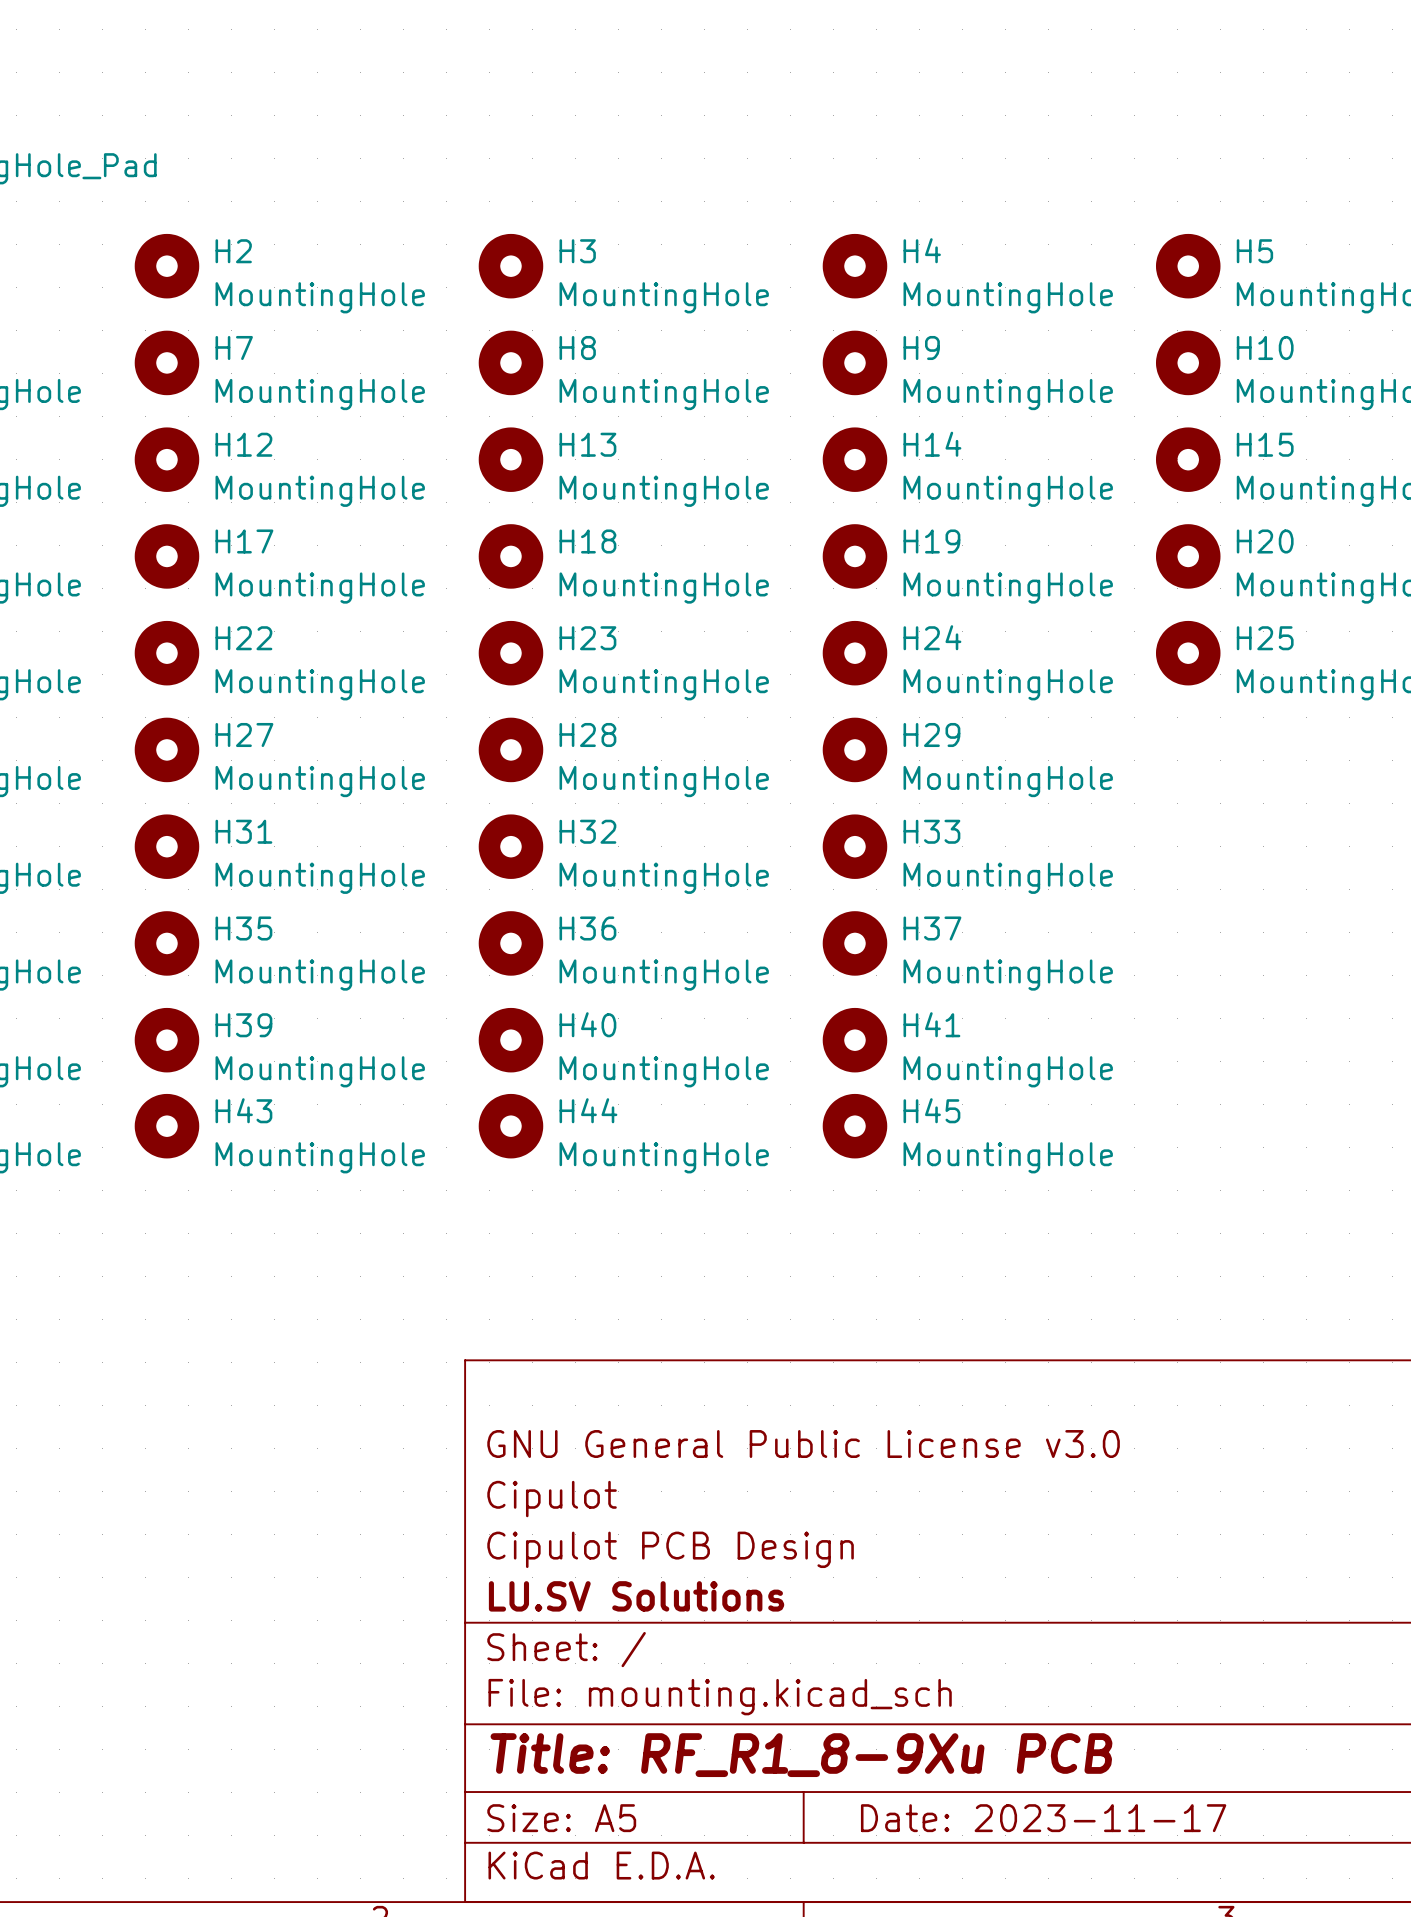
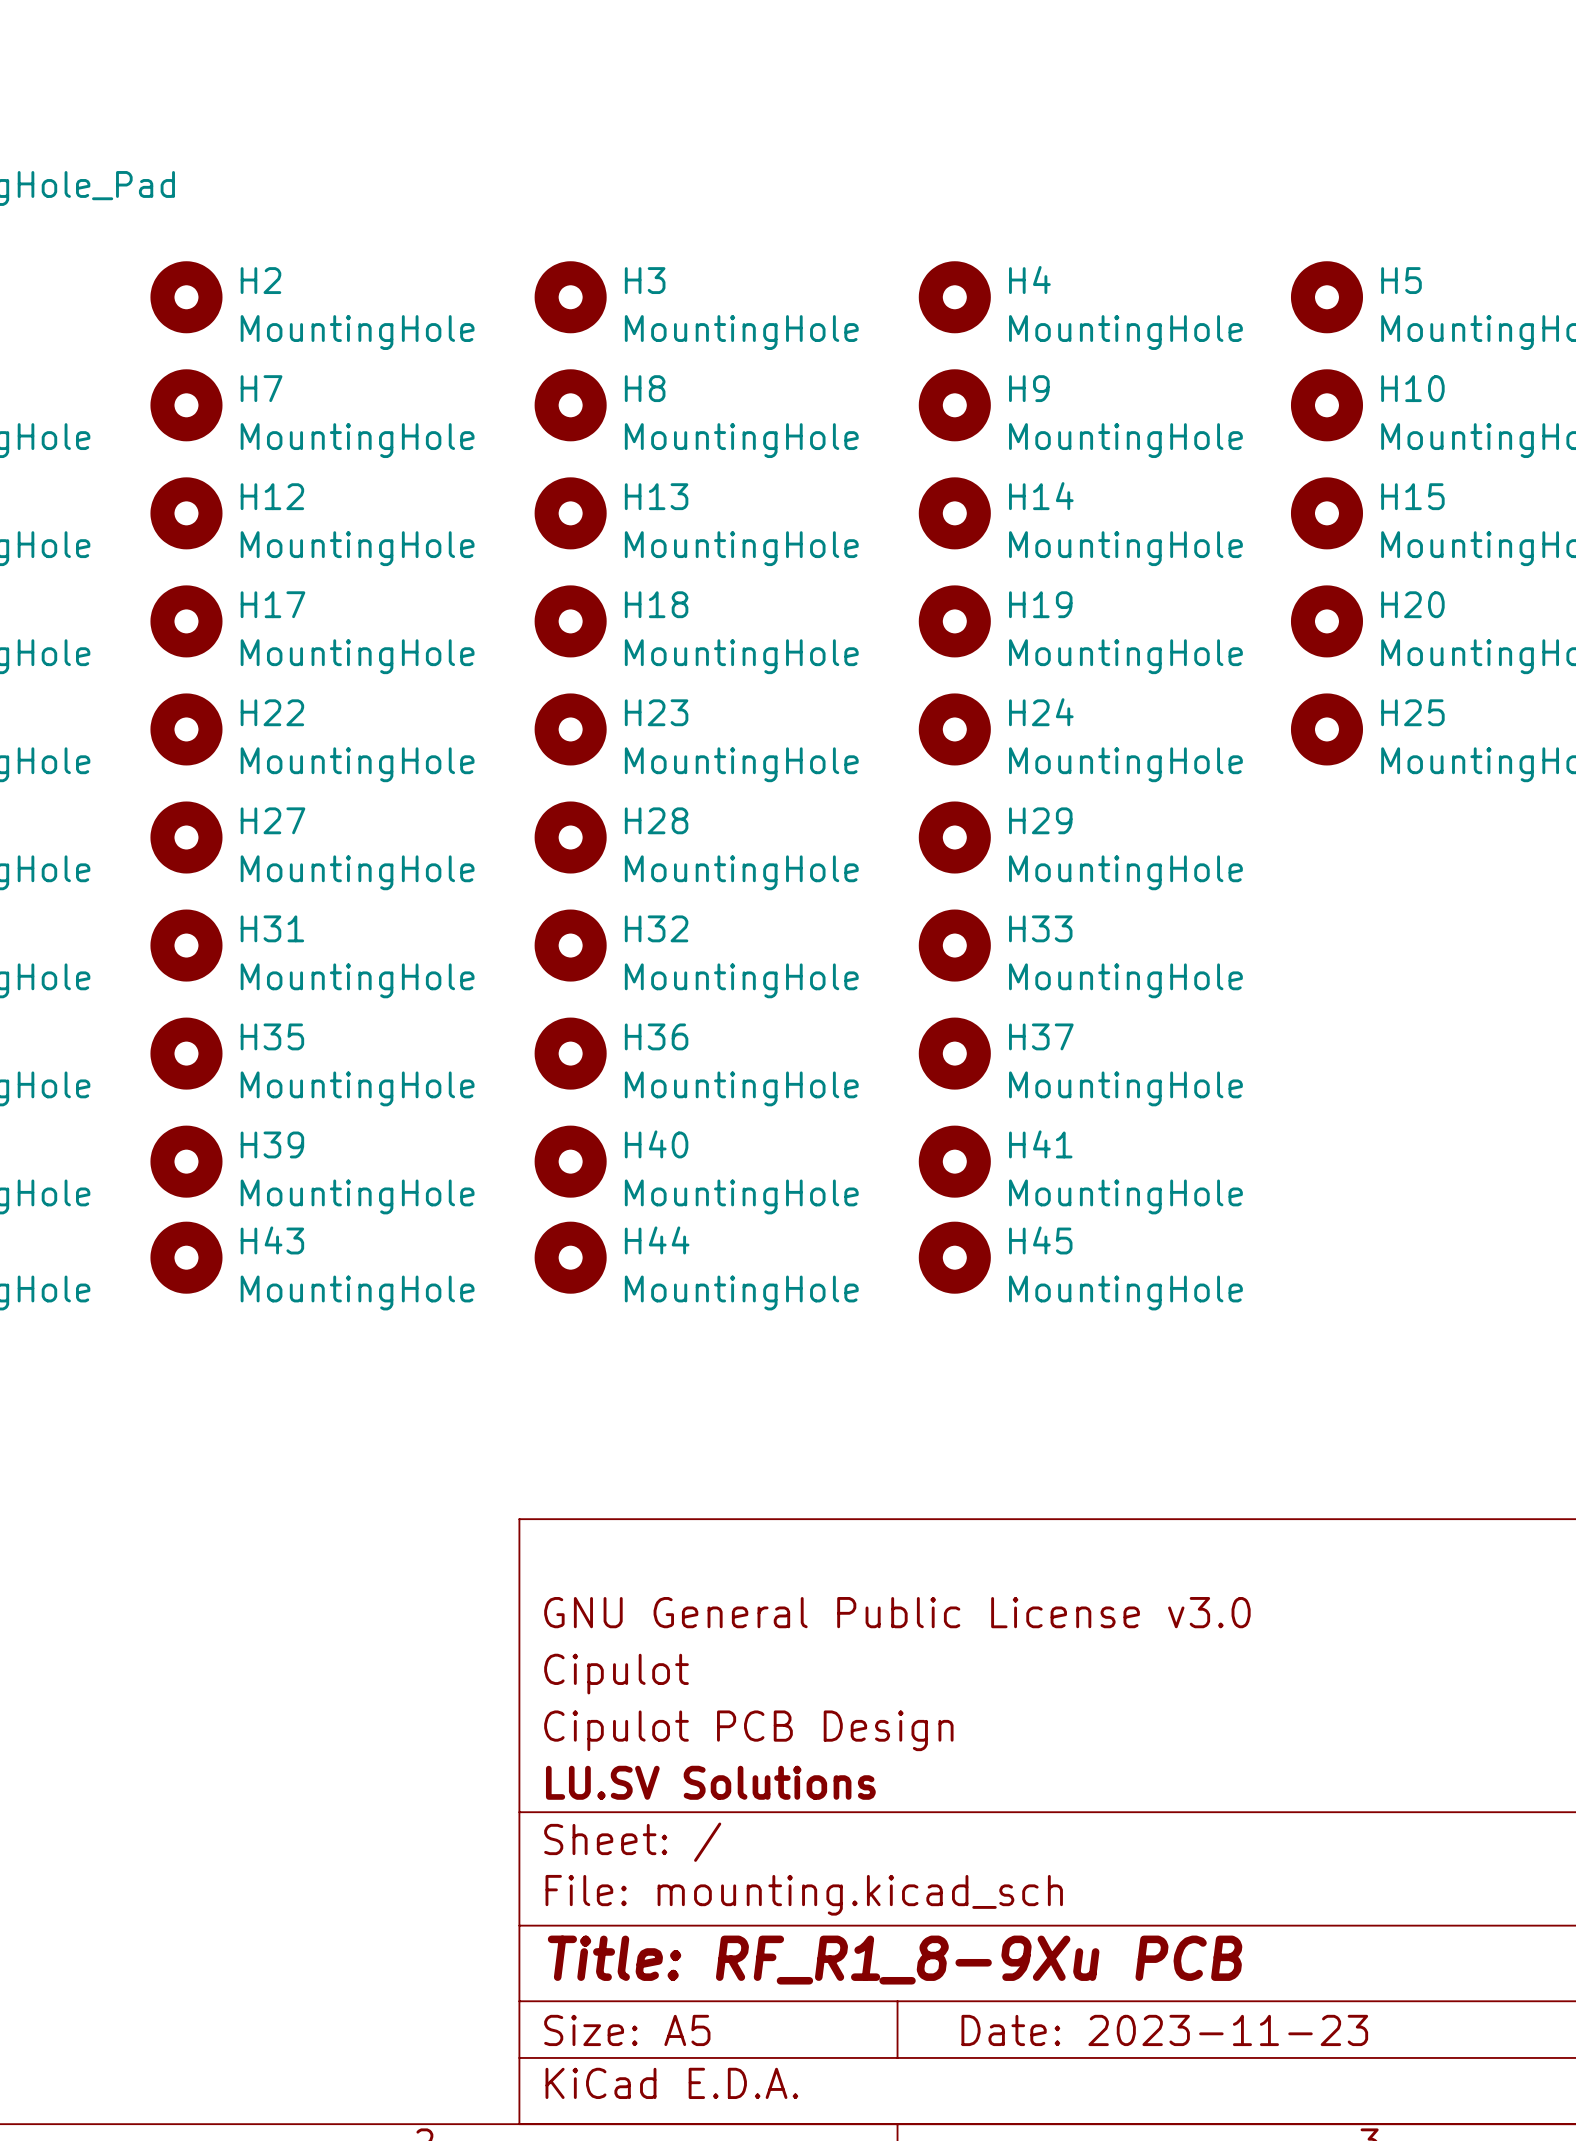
title block: Date: 2023-11-17 (1043, 1818) -> Date: 2023-11-23 (1164, 2030)

